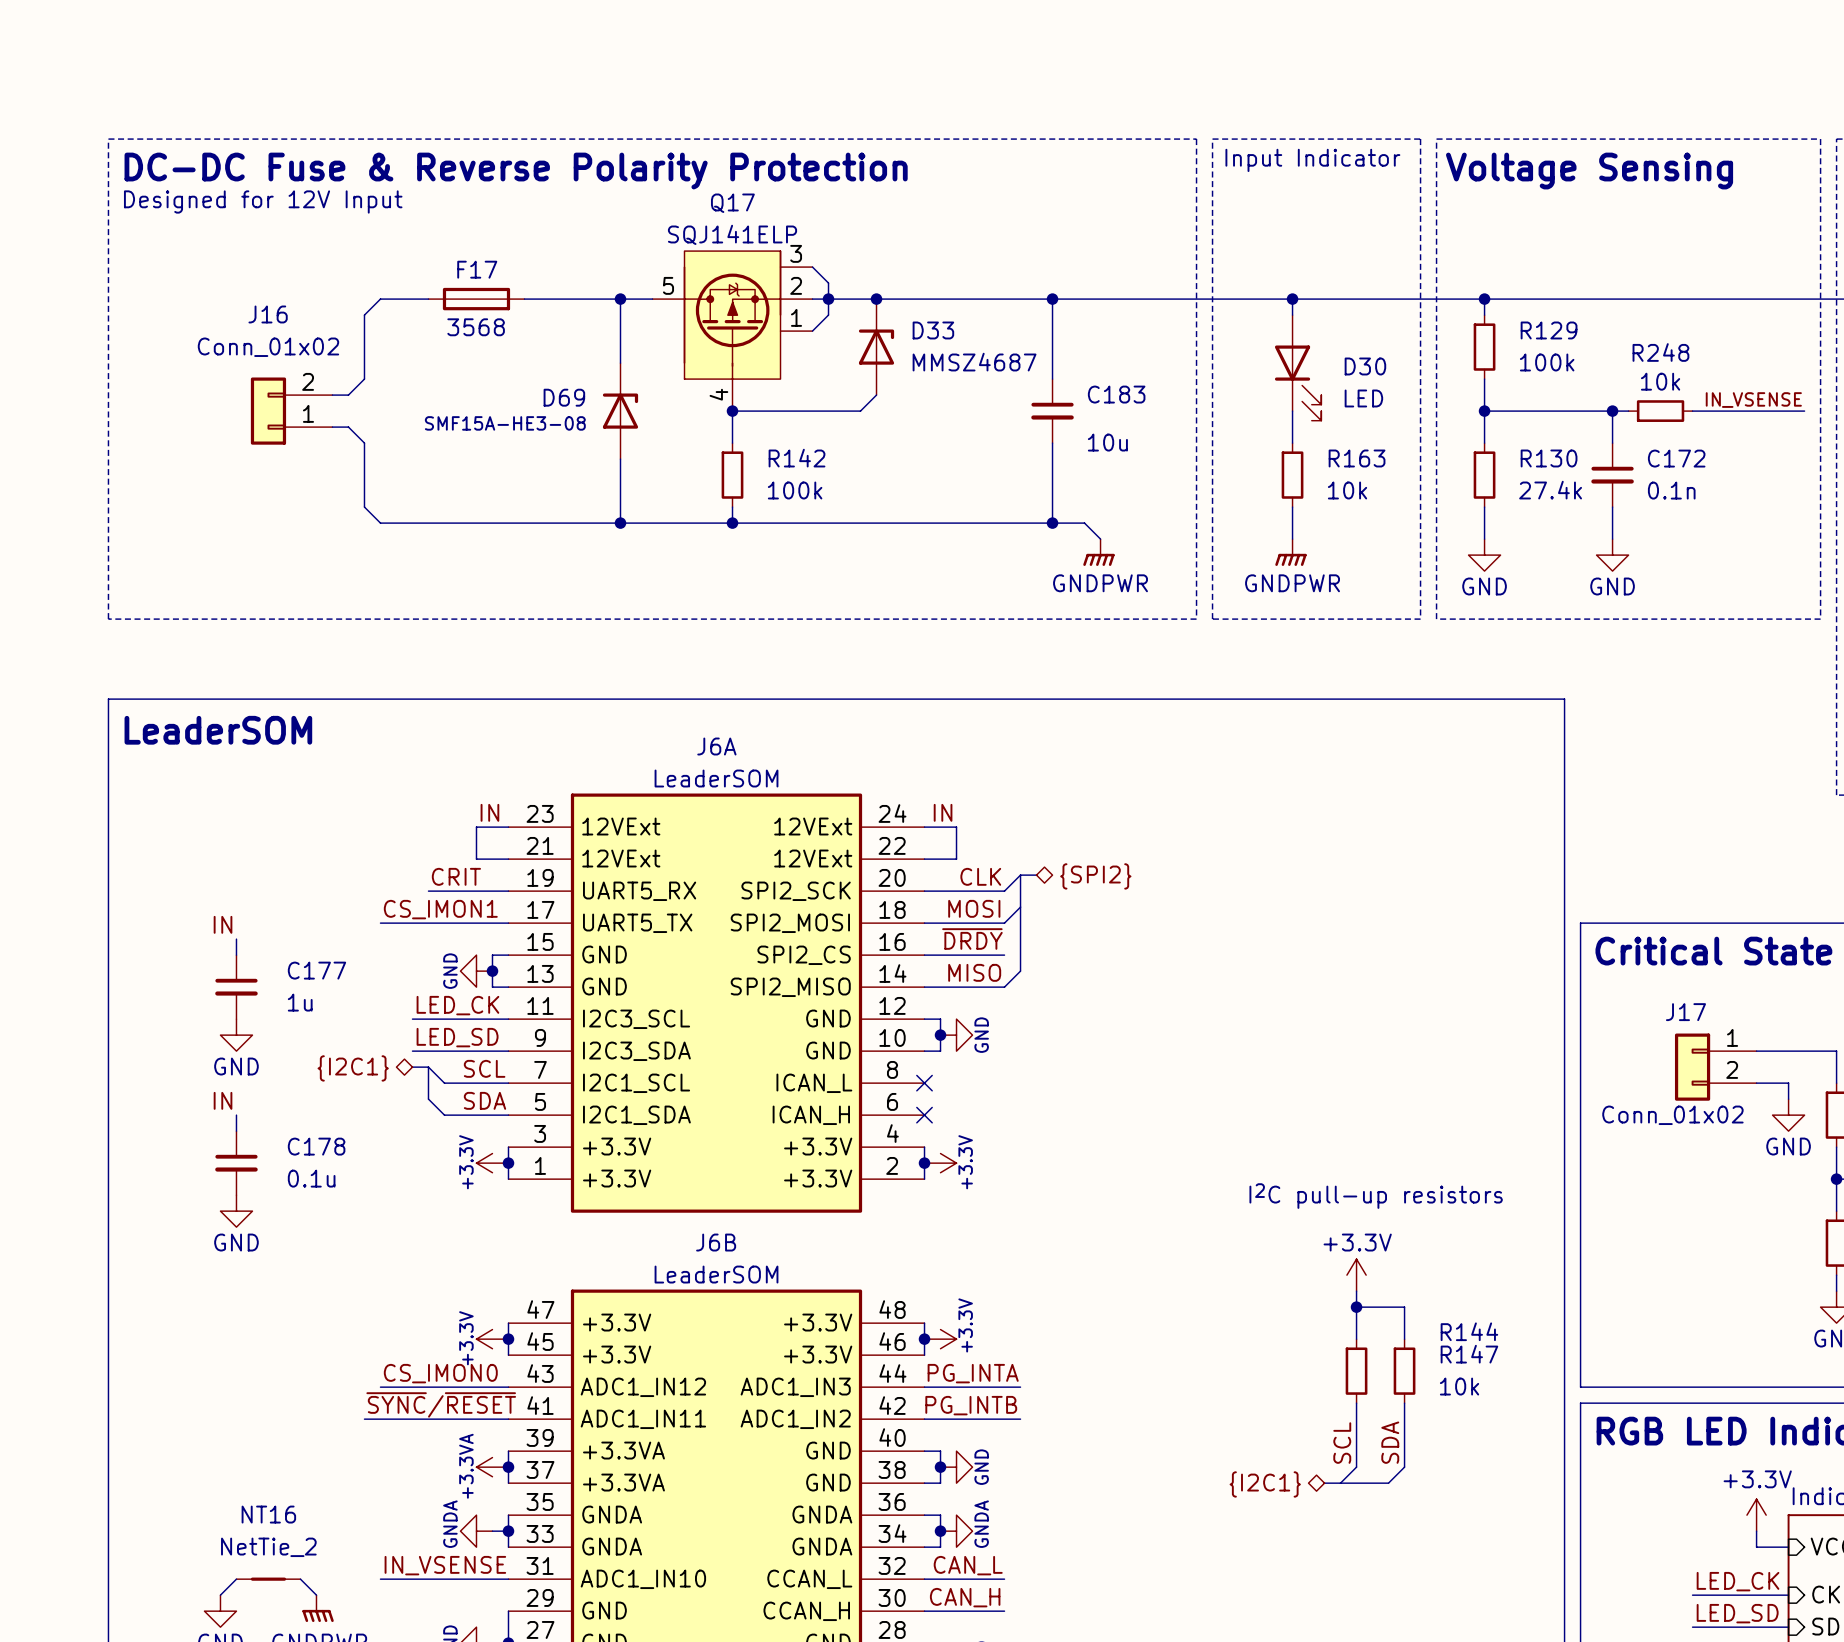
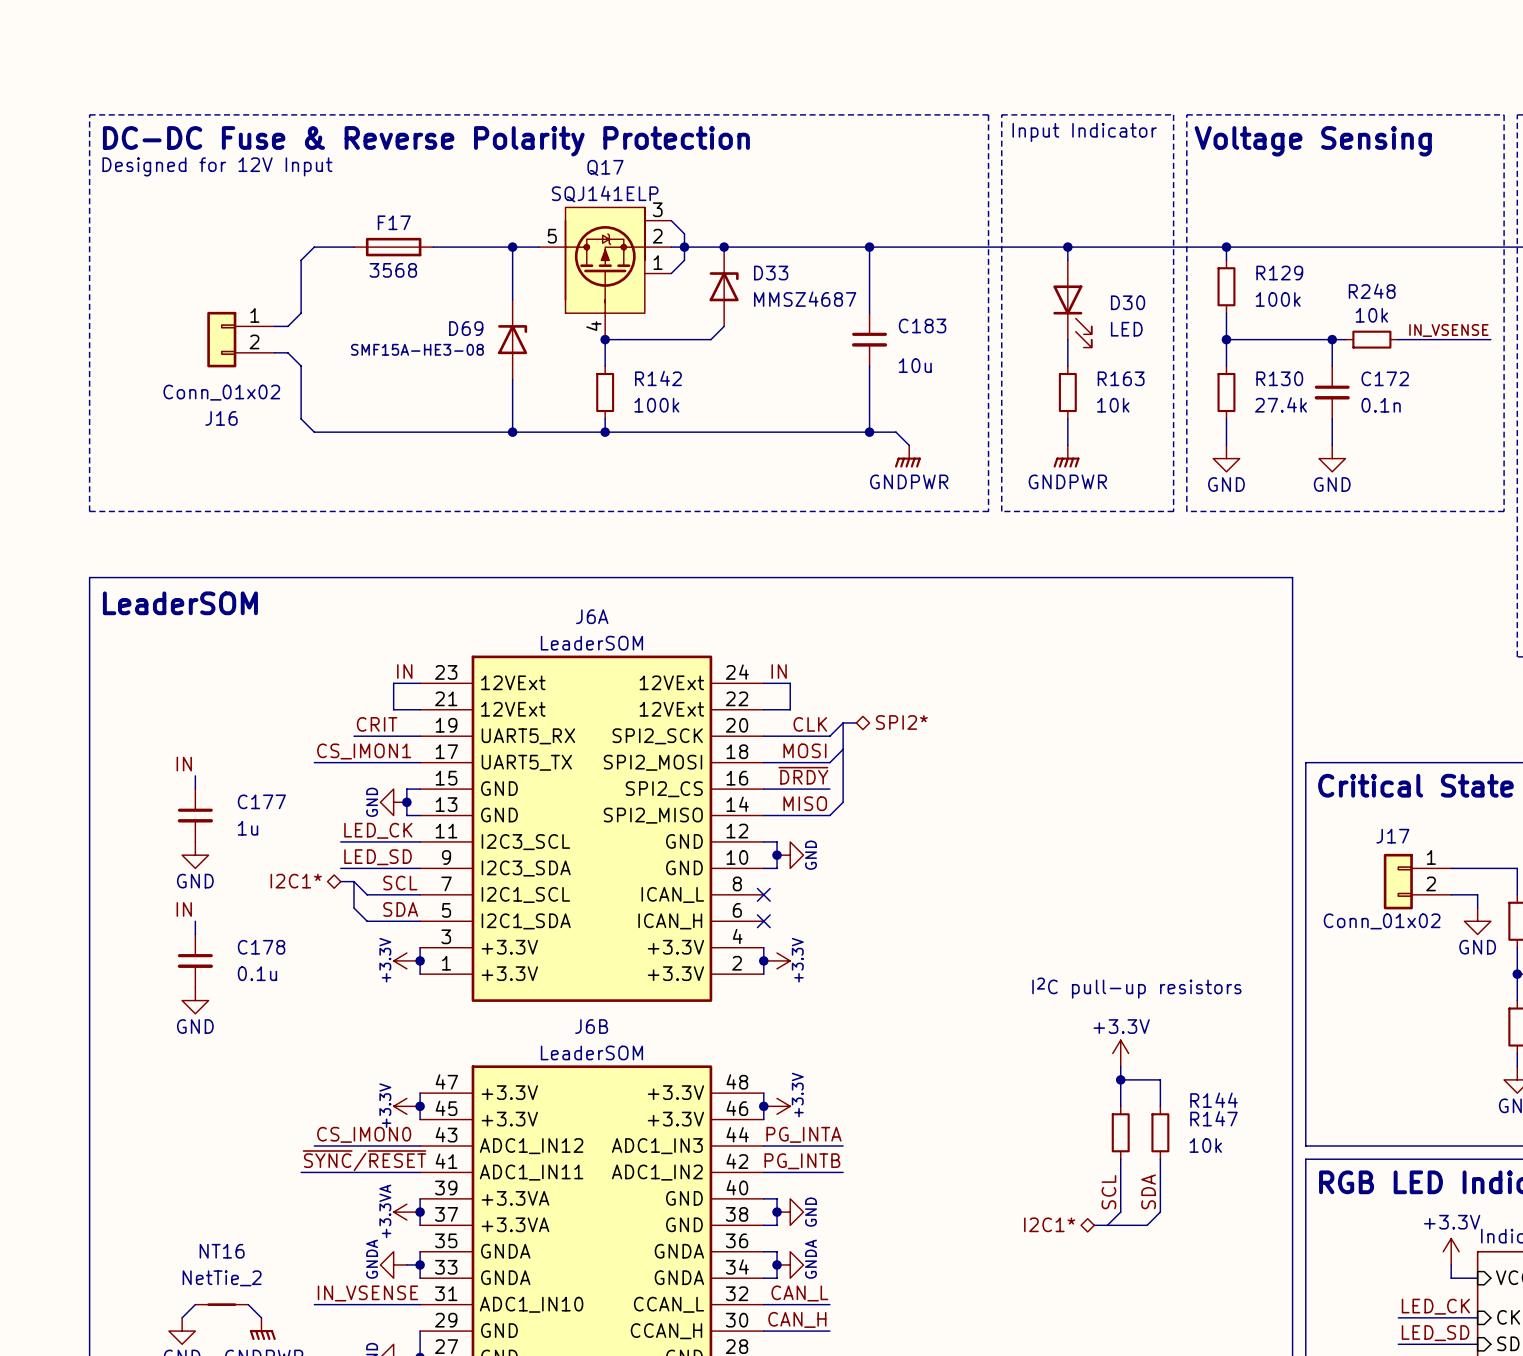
J16 flip: as is (268, 411) -> up-down (221, 339)
hierarchical label: {SPI2} (1095, 876) -> SPI2* (901, 722)
hierarchical label: {I2C1} (353, 1068) -> I2C1* (296, 881)
hierarchical label: {I2C1} (1265, 1484) -> I2C1* (1049, 1224)

